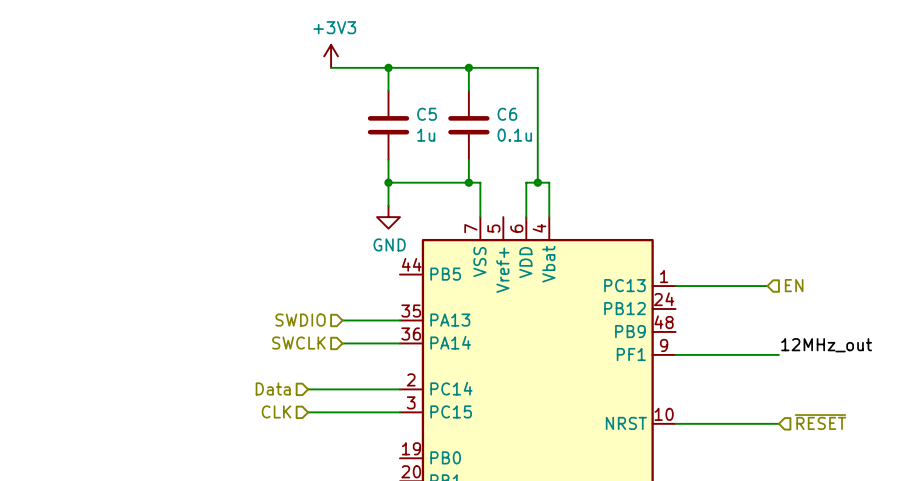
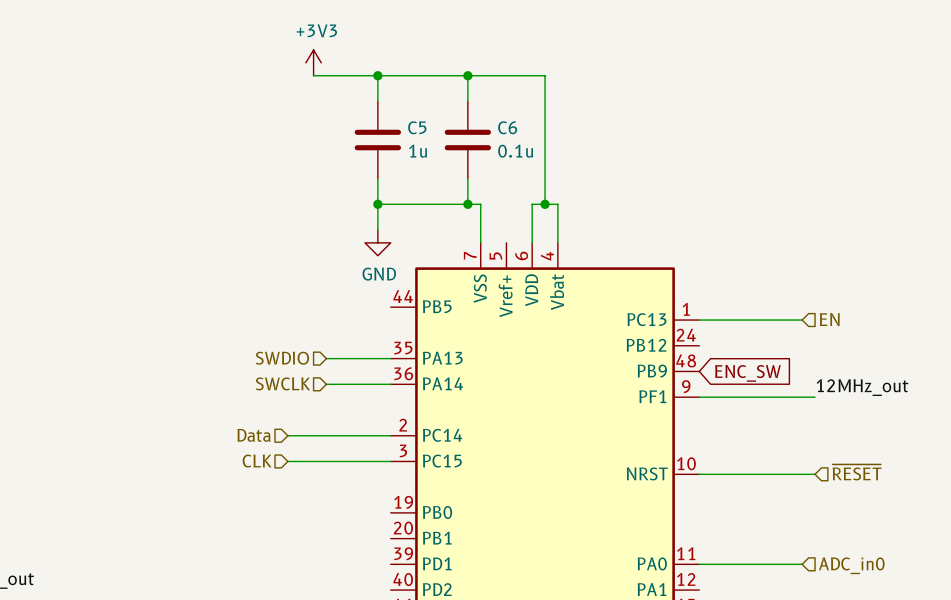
global label: none -> ENC_SW (747, 373)

